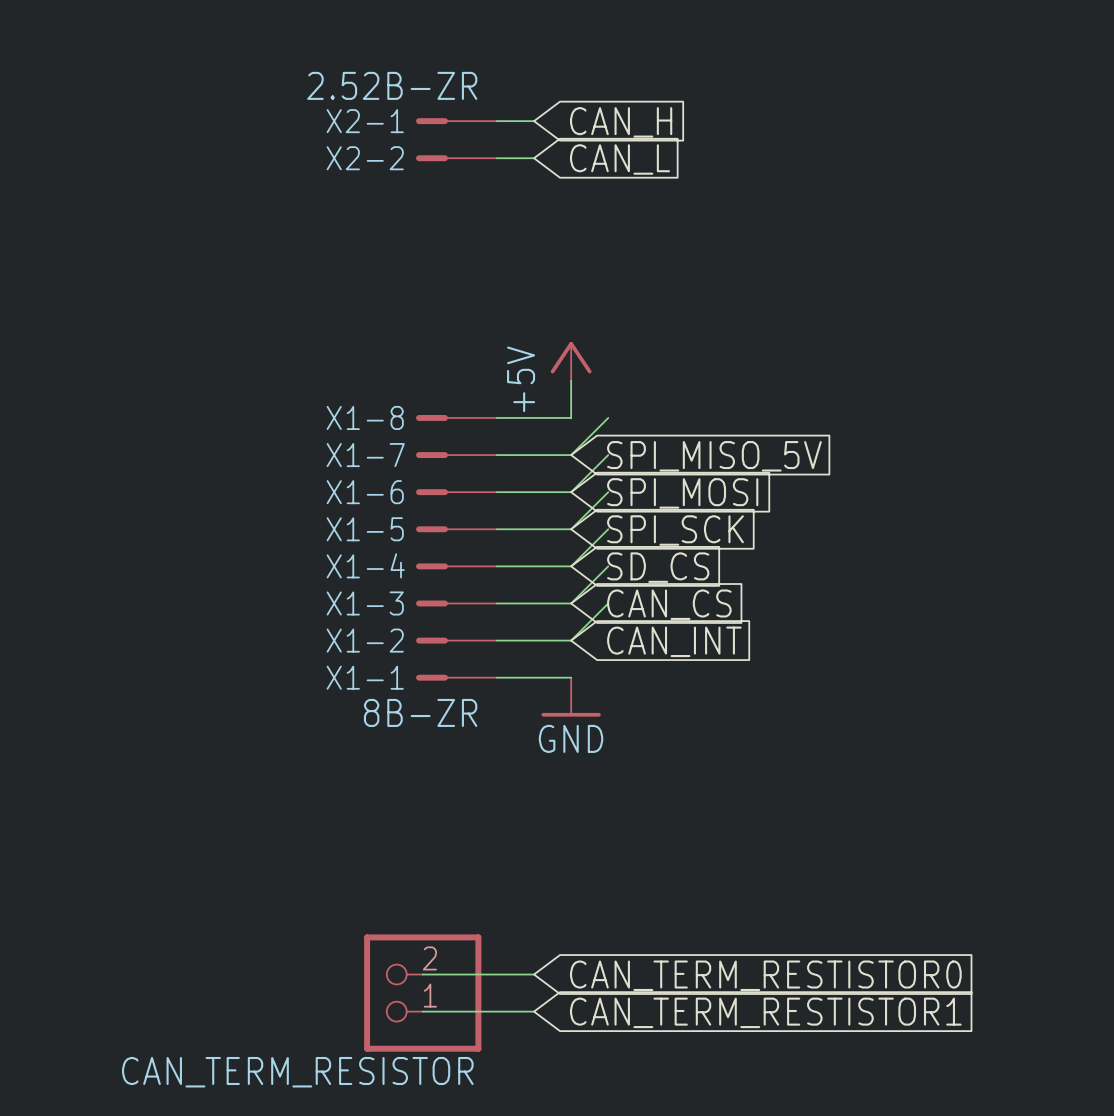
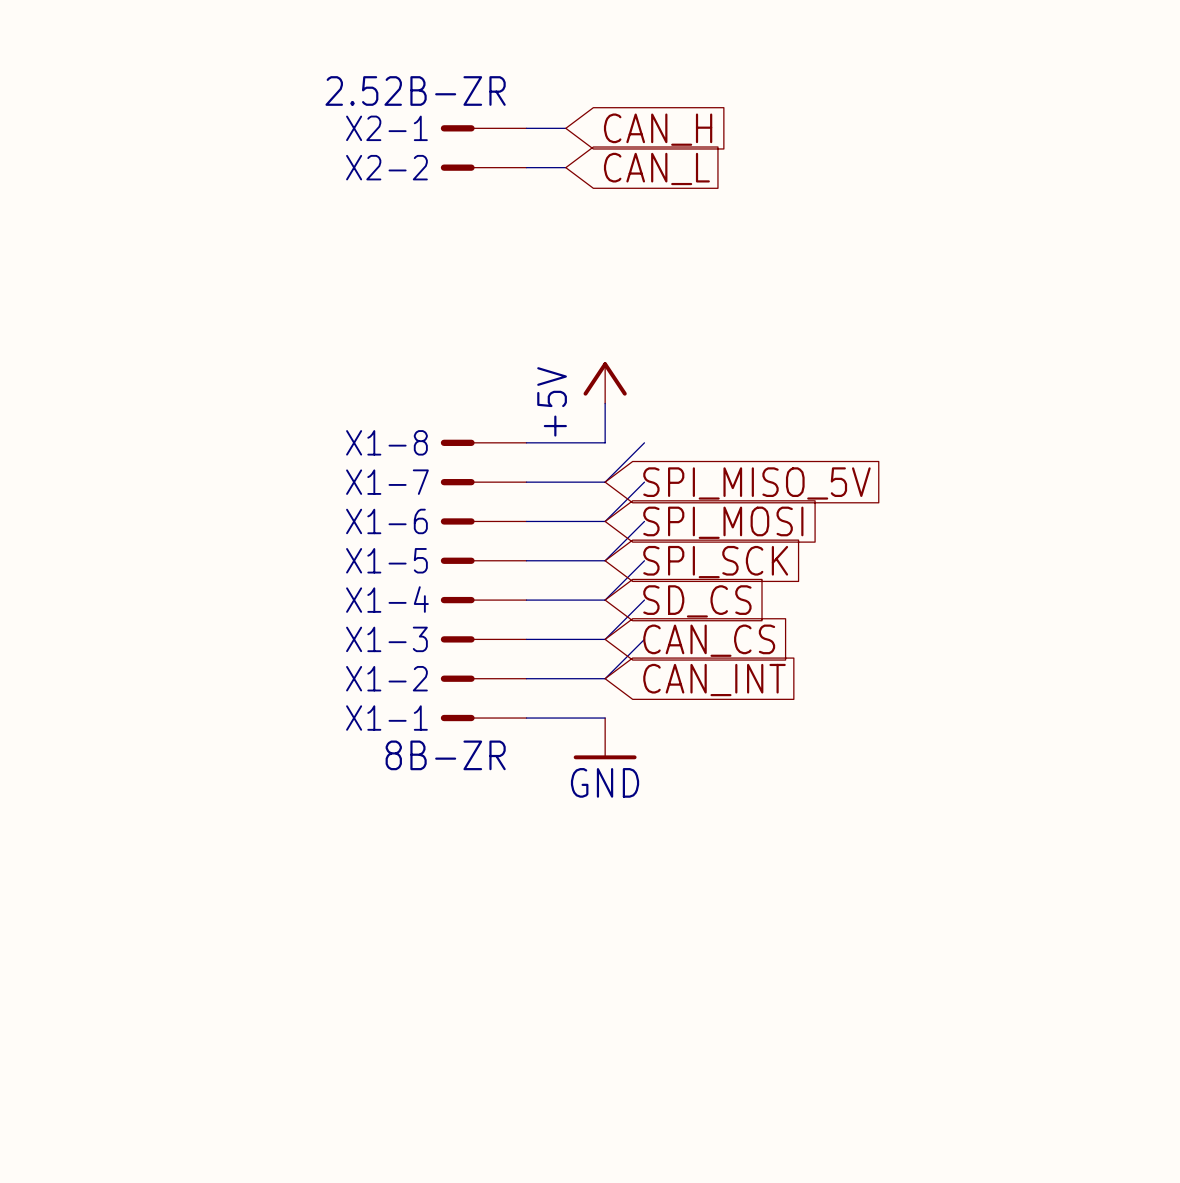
wire: (422, 974) (534, 974) -> none
global label: CAN_TERM_RESTISTOR0 (765, 975) -> none
CAN_TERM_RESISTOR: (422, 993) -> none
wire: (422, 1011) (534, 1011) -> none
global label: CAN_TERM_RESTISTOR1 (765, 1012) -> none

